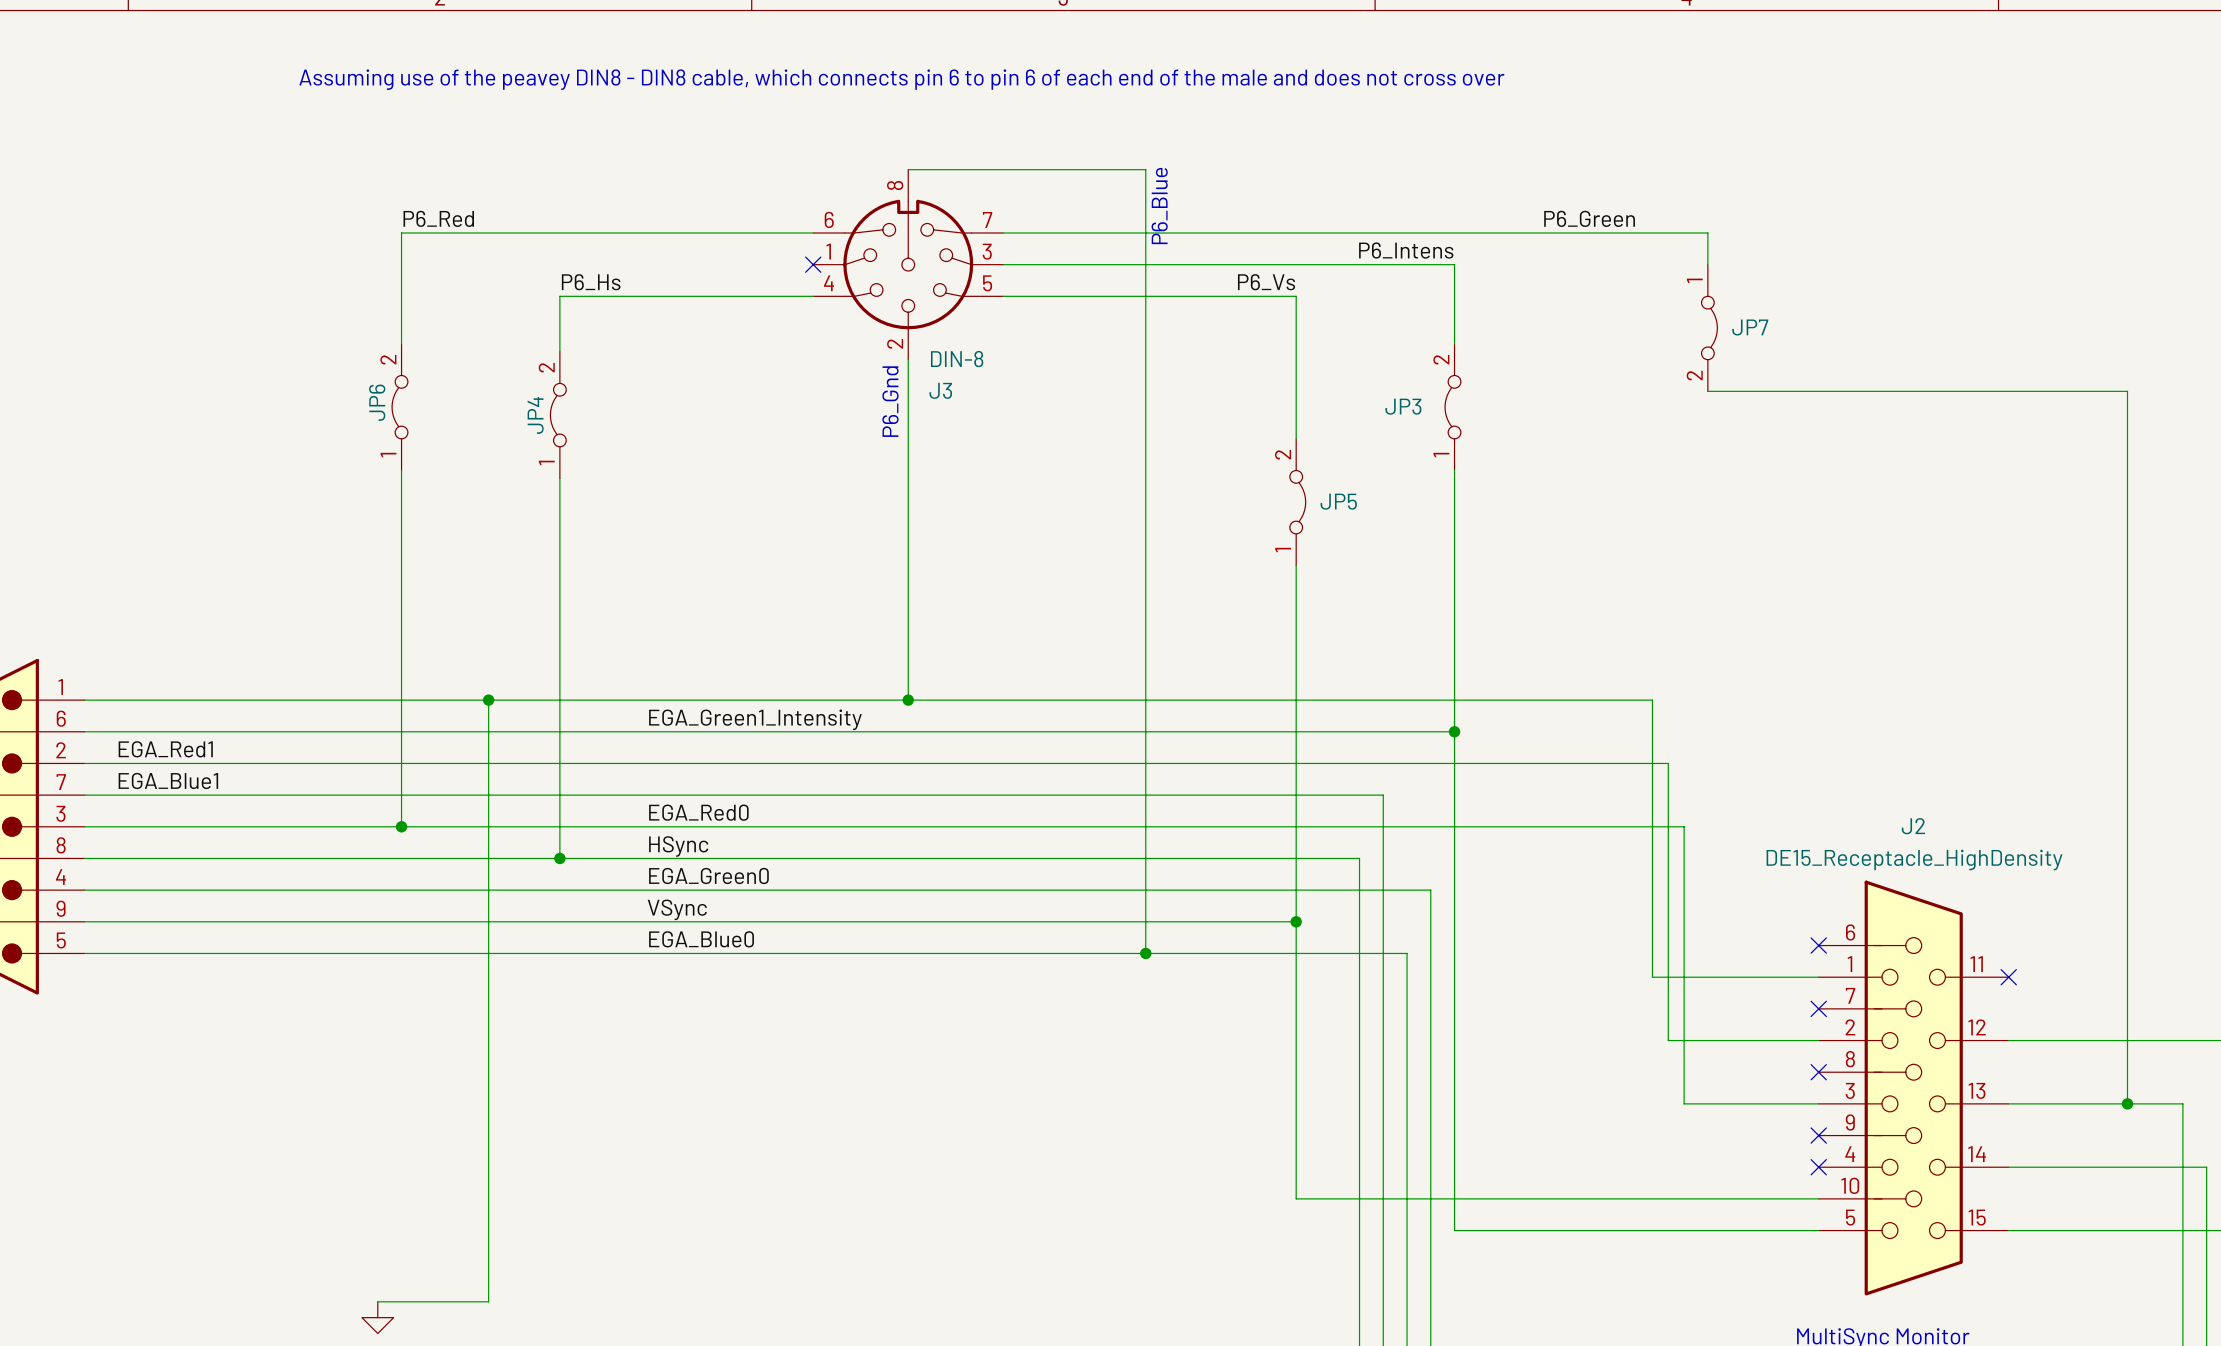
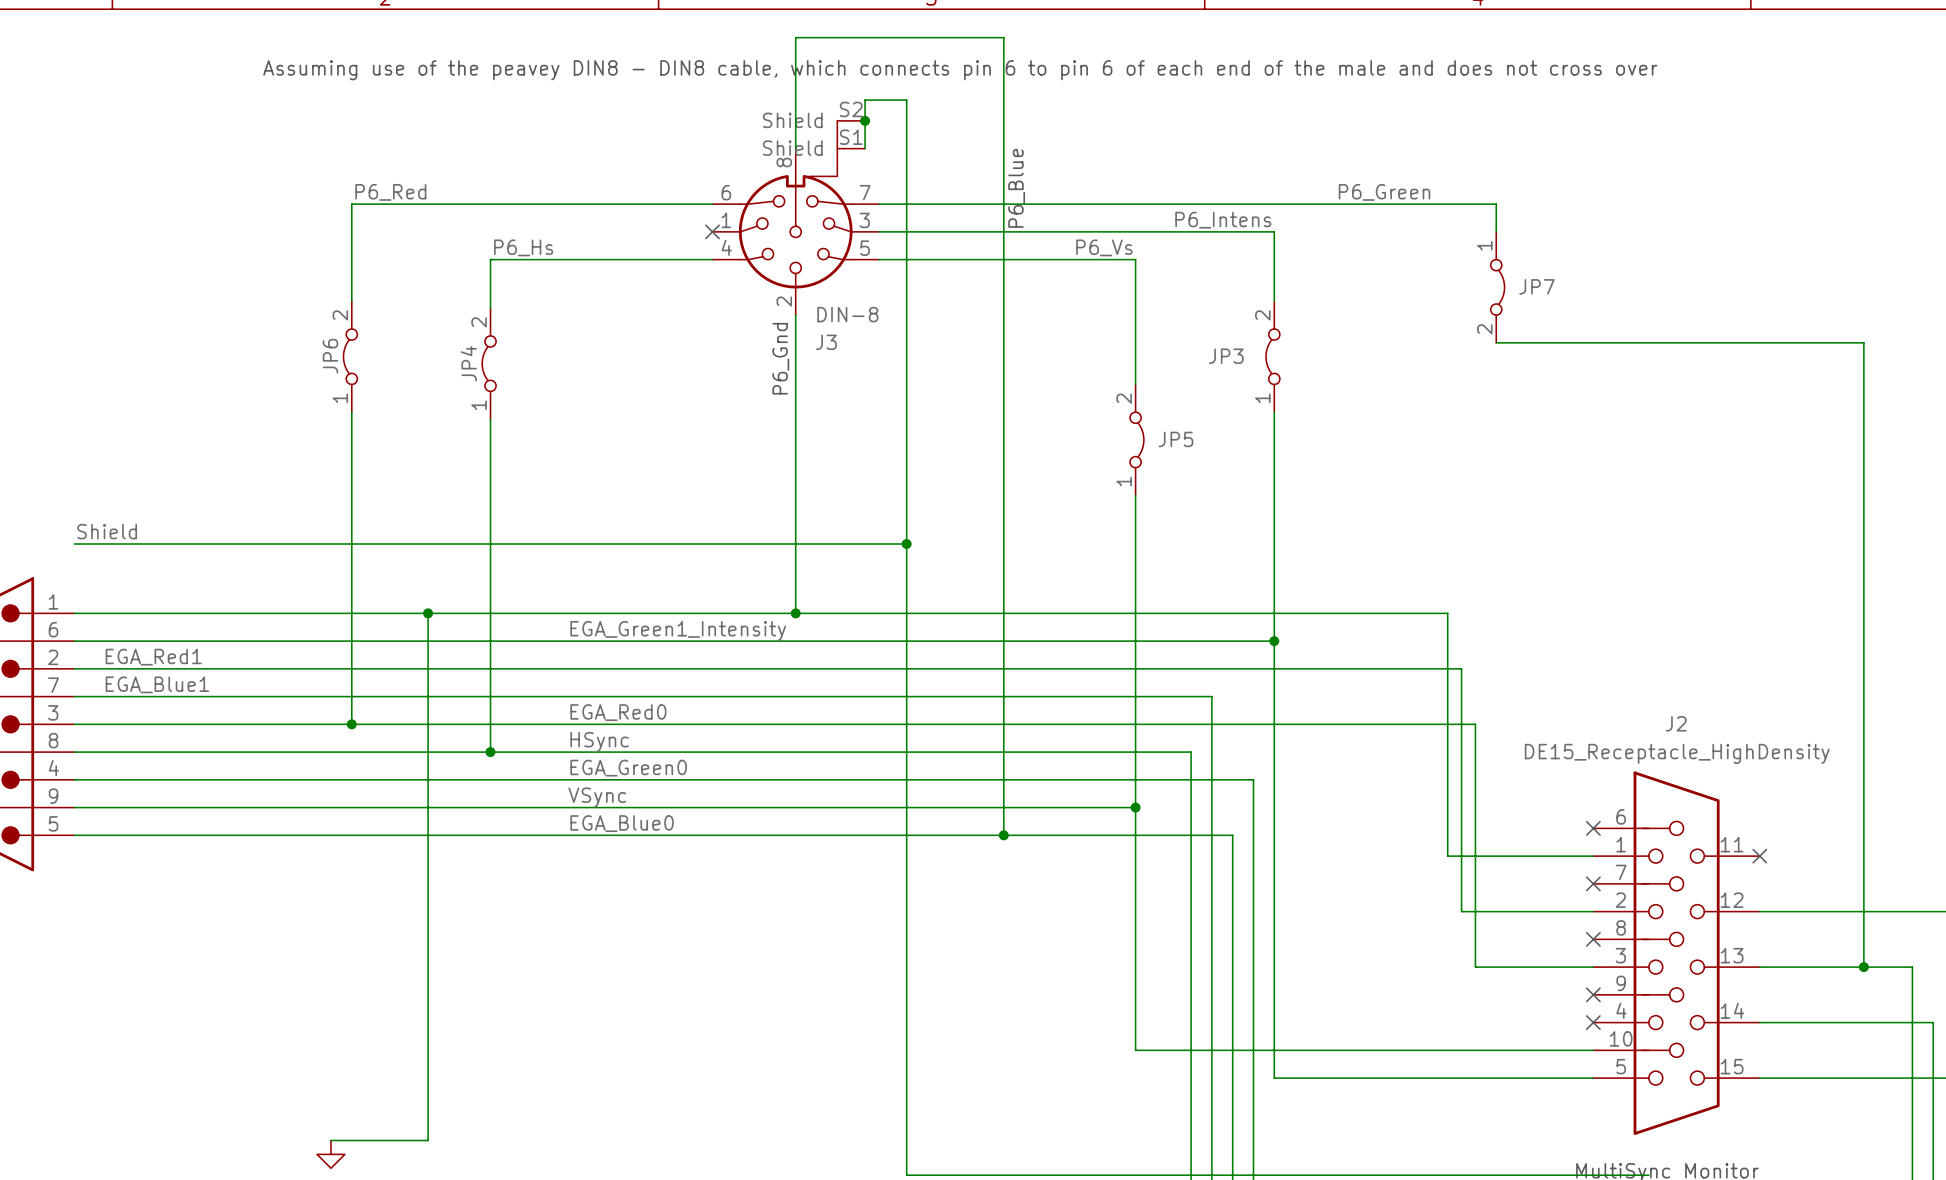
junction: none -> (865, 120)
J3 symbol: [813, 169, 1004, 360] -> [712, 120, 879, 316]
wire: (908, 169) (1145, 169) -> (795, 148) (795, 37) (1003, 37) (1003, 148)
wire: none -> (865, 148) (865, 100) (906, 100) (906, 1175) (1648, 1175)
label: none -> Shield (107, 531)
wire: none -> (74, 544) (906, 544)
junction: none -> (906, 544)

